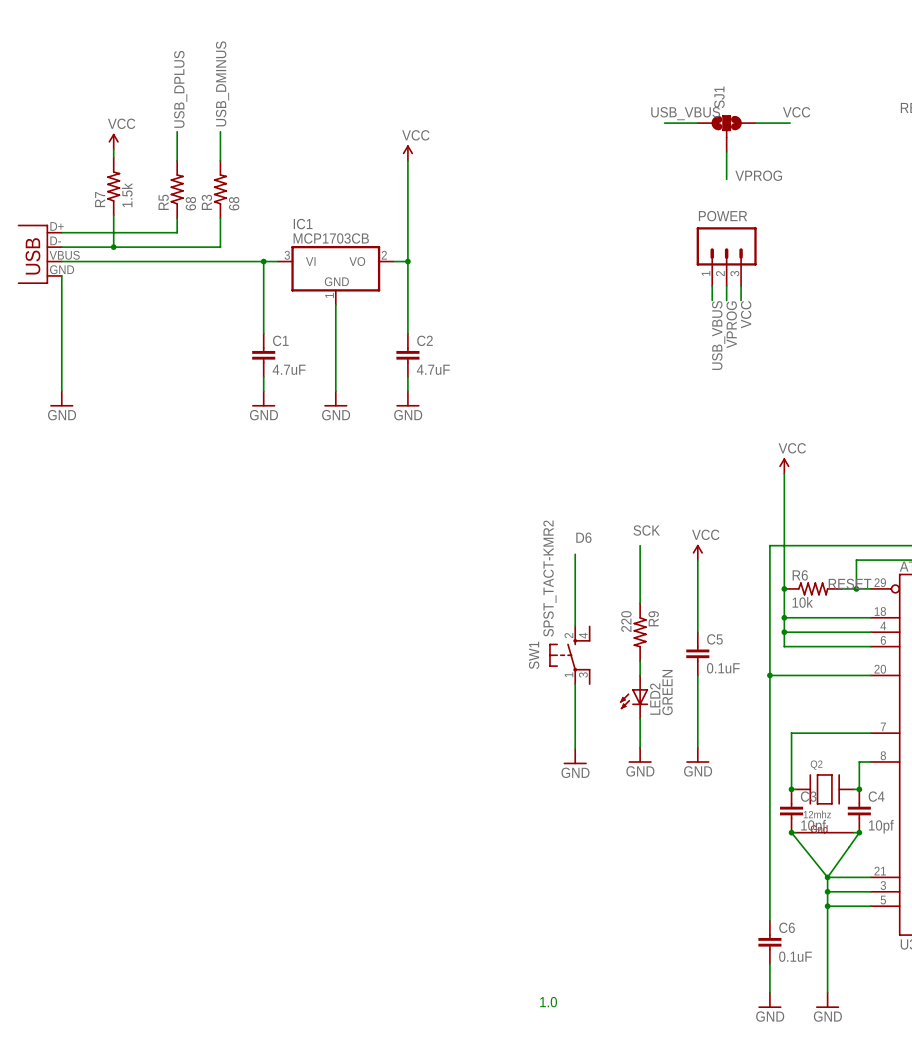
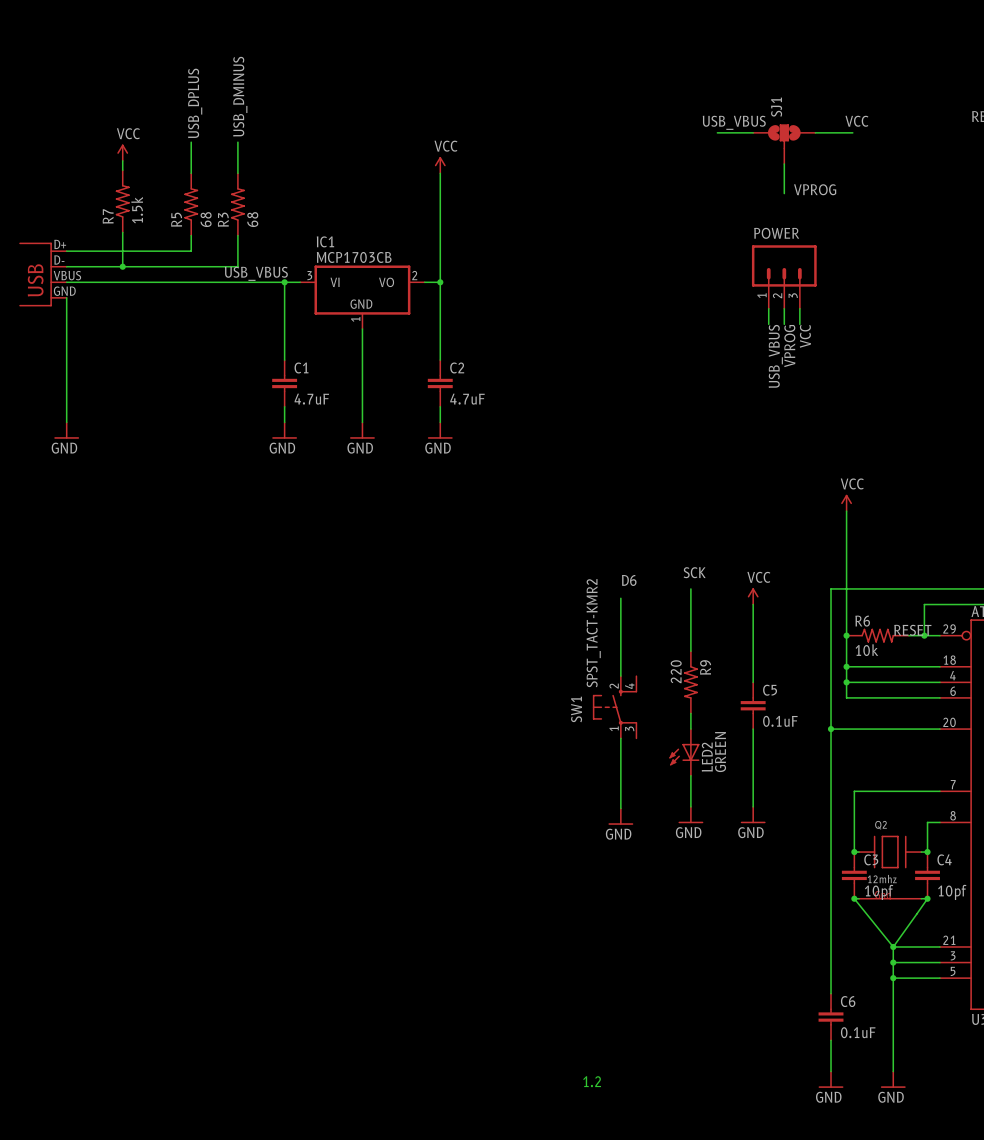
label: none -> USB_VBUS (256, 273)
text: 1.0 (548, 1002) -> 1.2 (592, 1081)

